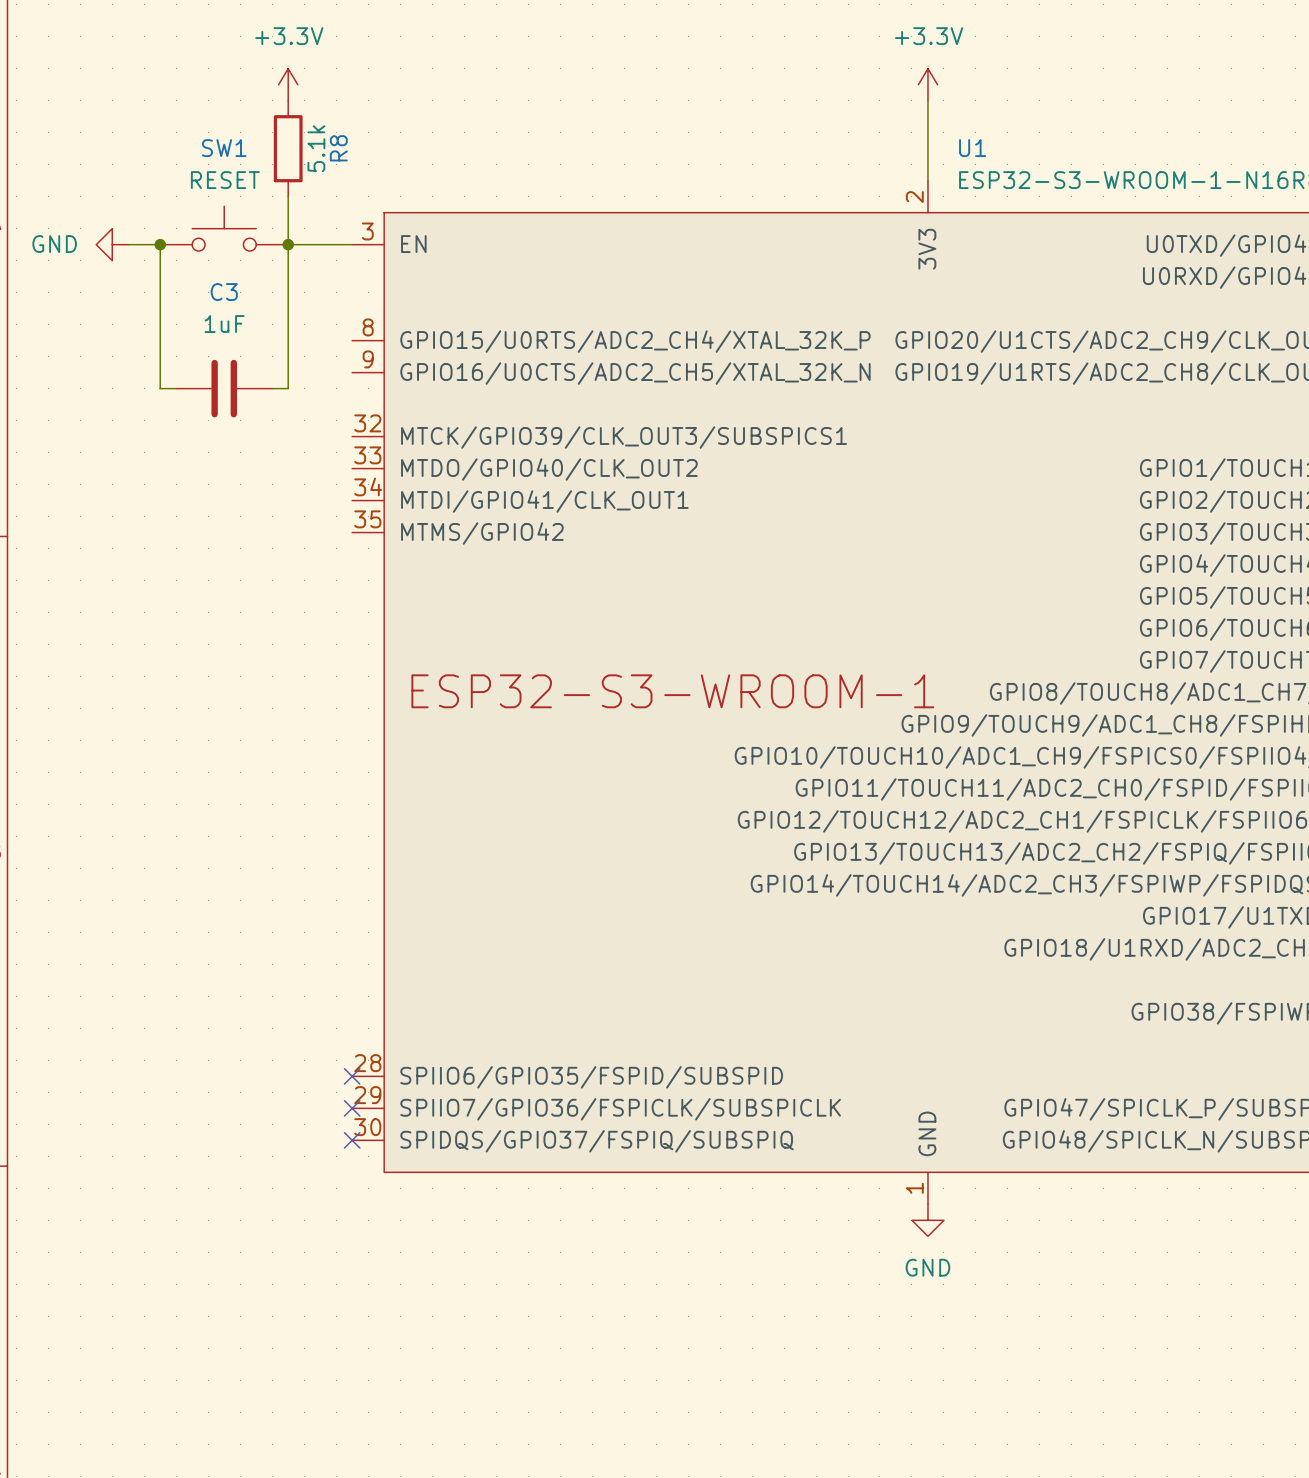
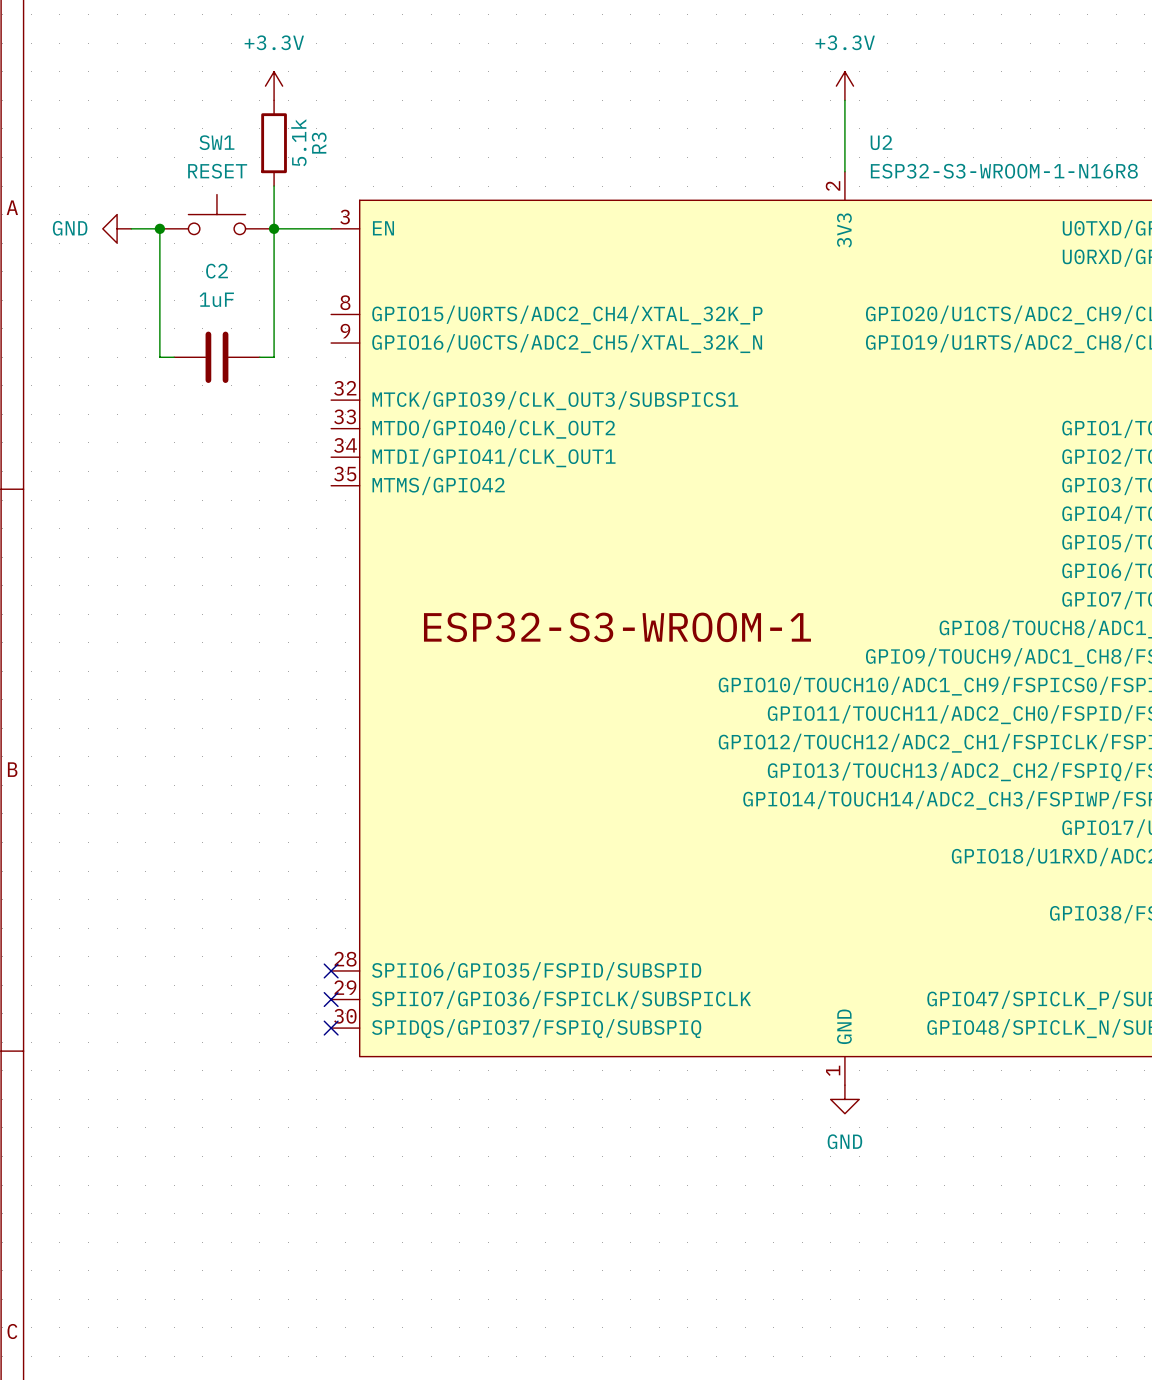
R8 name: R8 (338, 148) -> R3 (319, 143)
U1 name: U1 (972, 148) -> U2 (881, 142)
C3 name: C3 (224, 292) -> C2 (217, 271)

